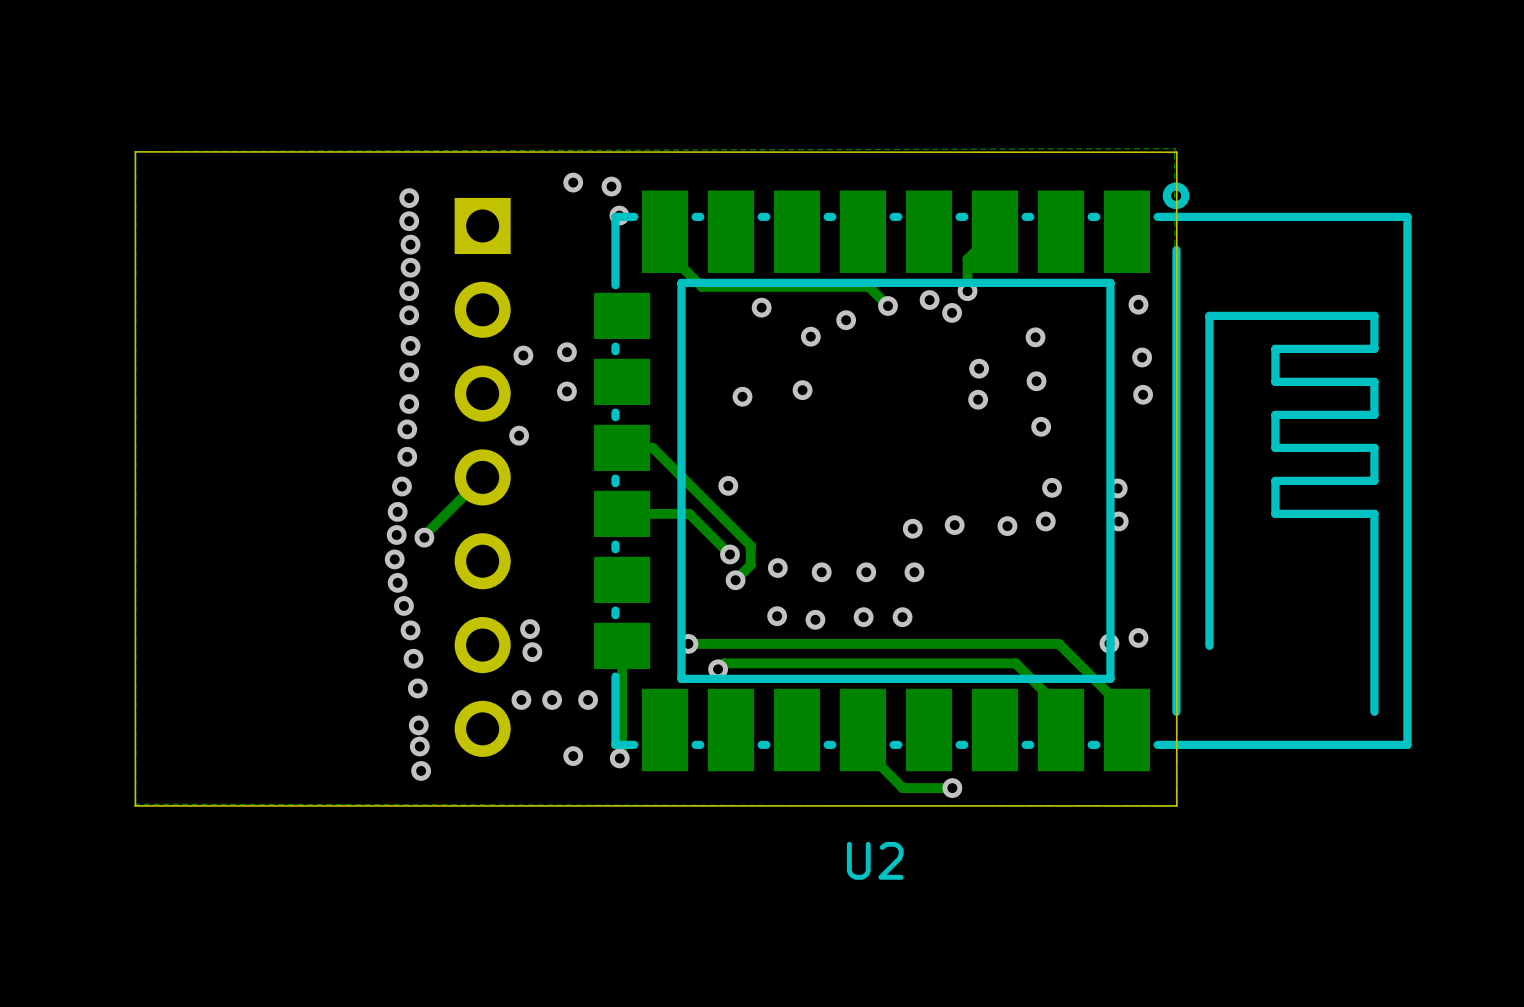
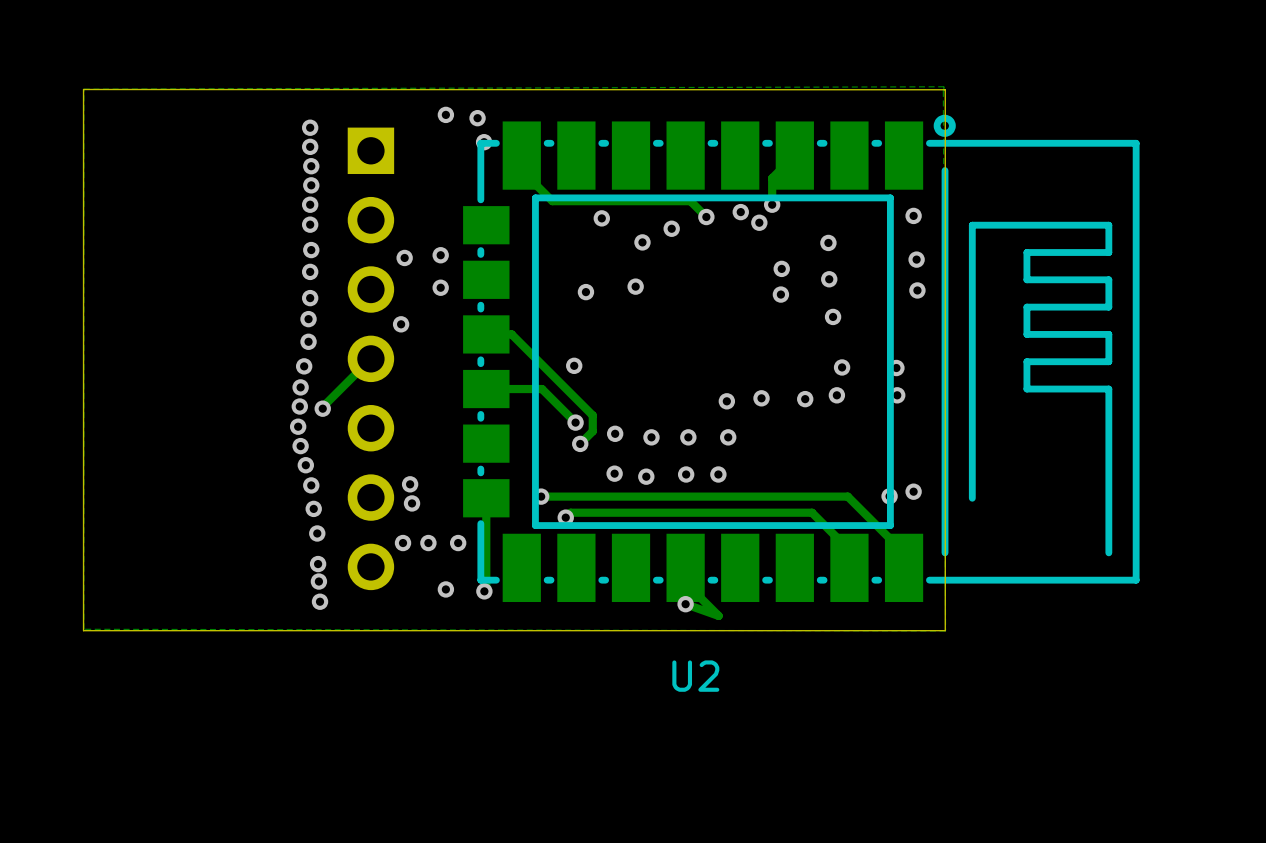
track: (952, 788) (902, 788) -> (685, 604) (718, 615)
via position: (952, 788) -> (685, 604)

